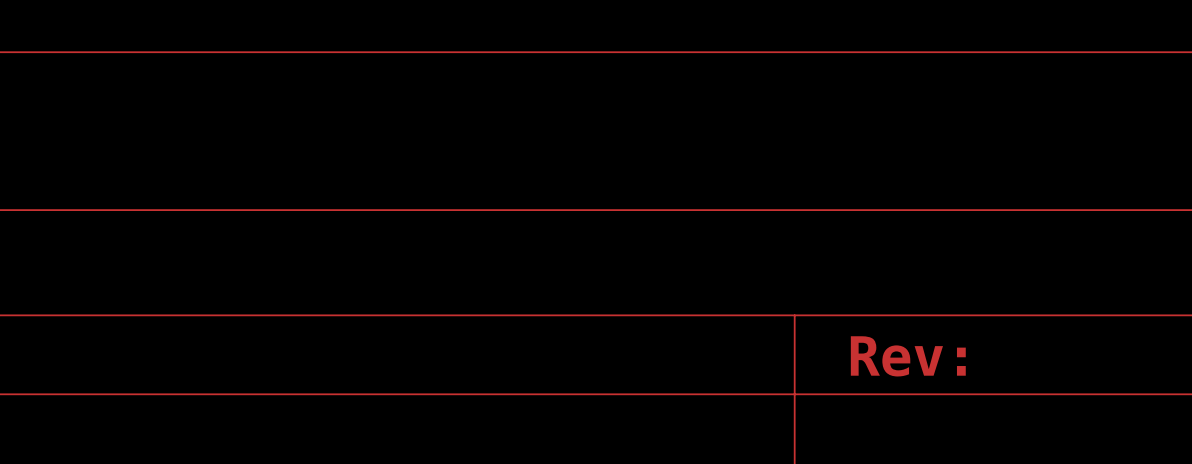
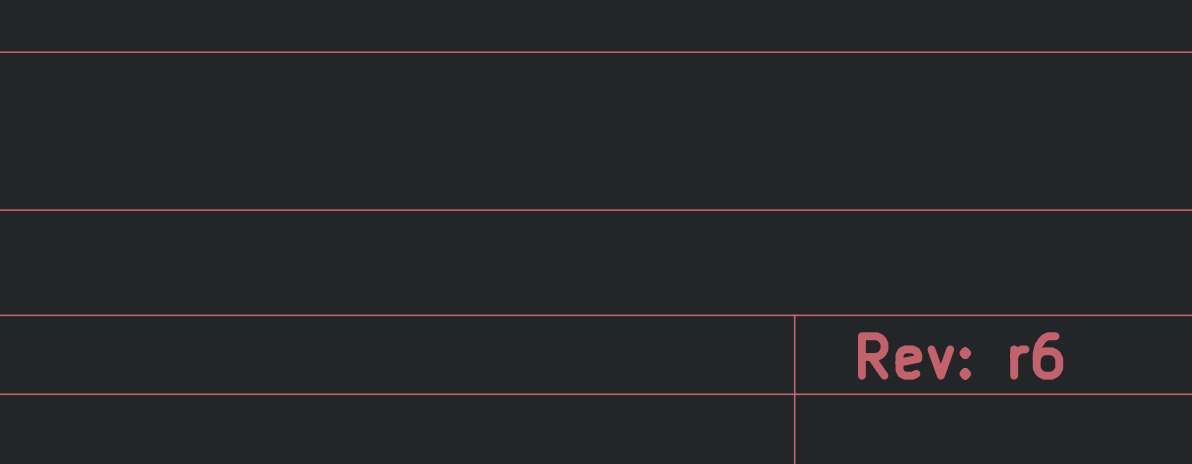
title block: Rev: (908, 356) -> Rev: r6 (960, 355)

